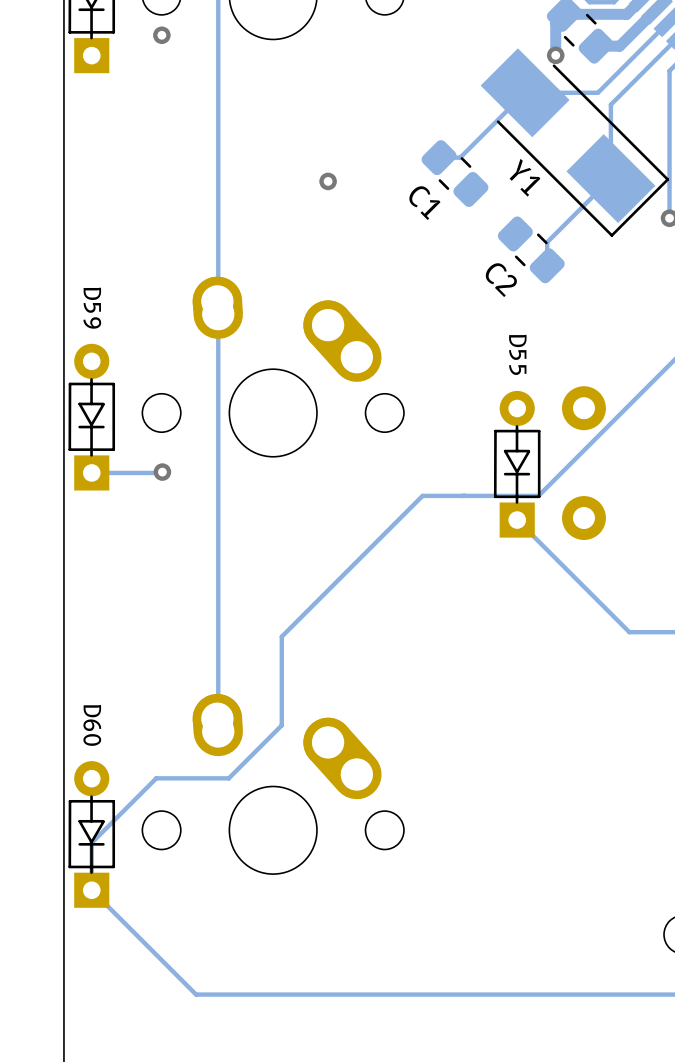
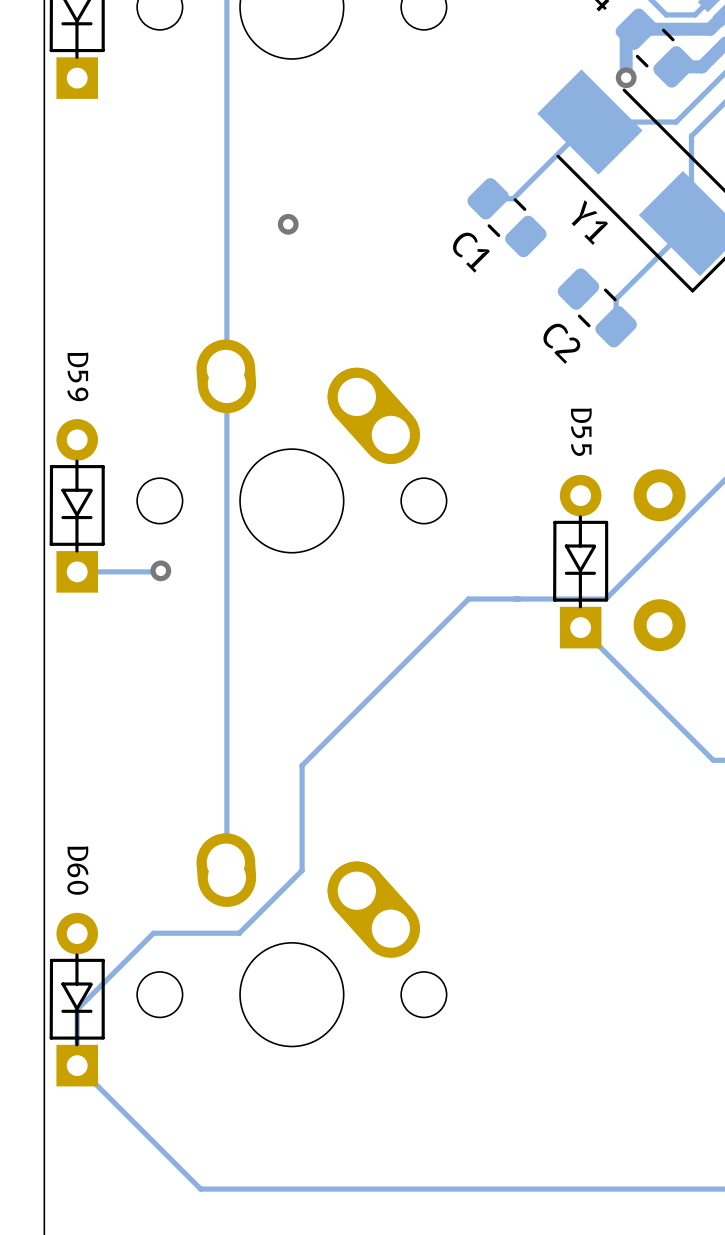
via: (161, 35) -> none
via position: (328, 181) -> (288, 224)

